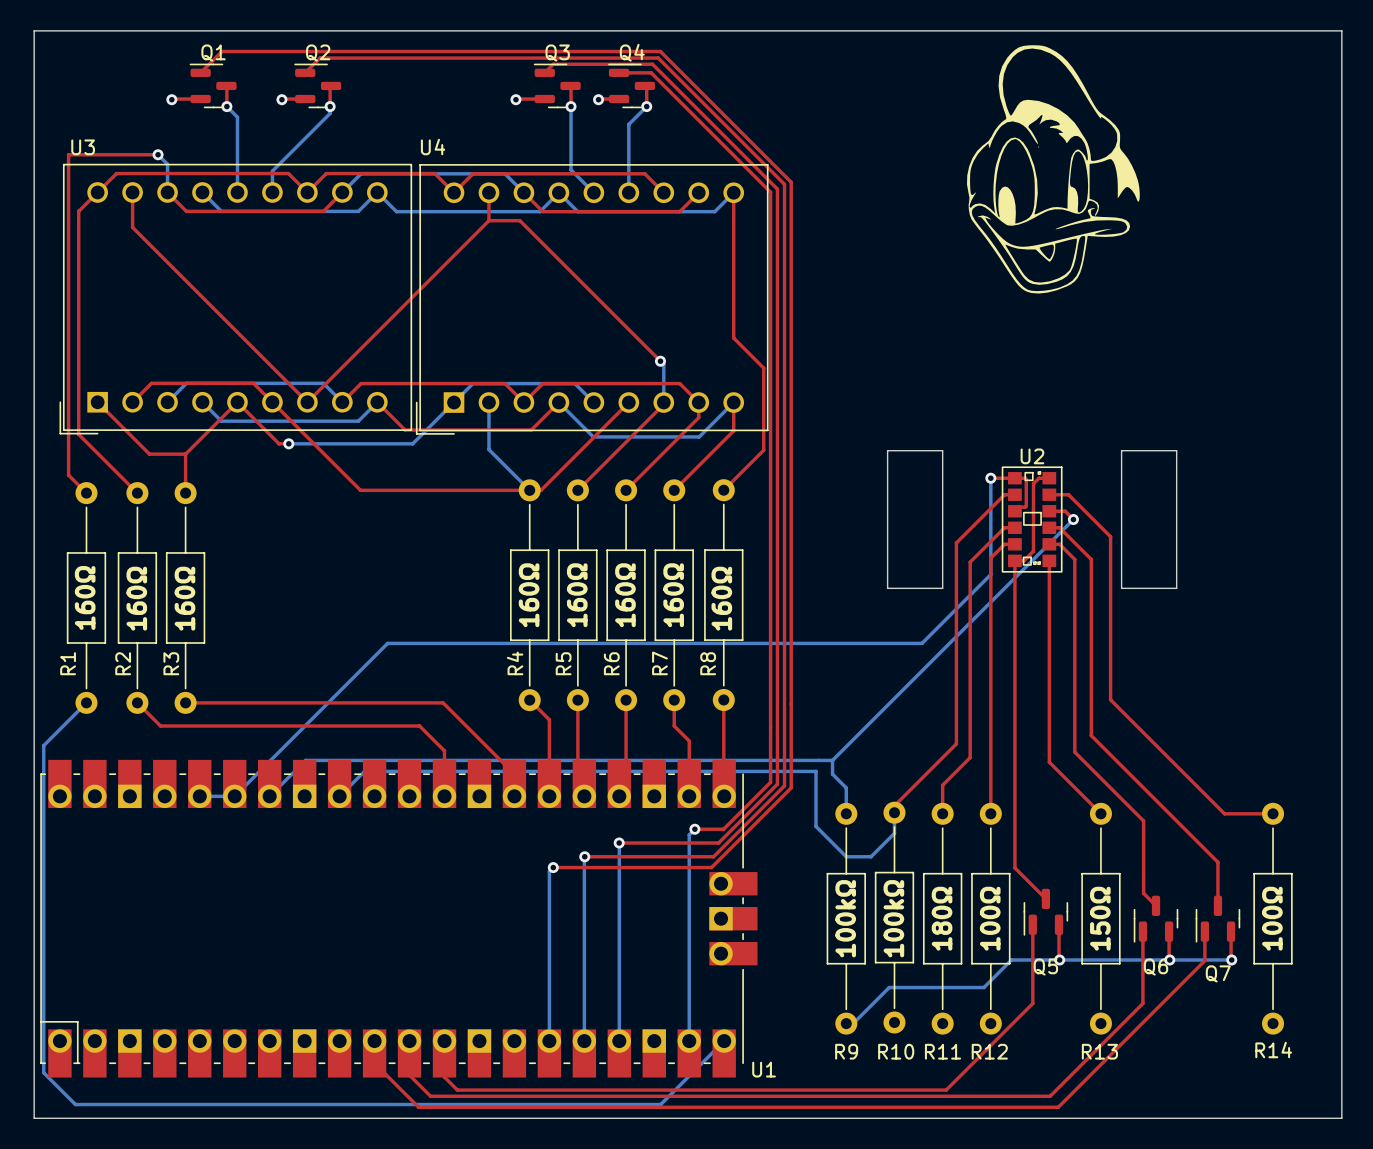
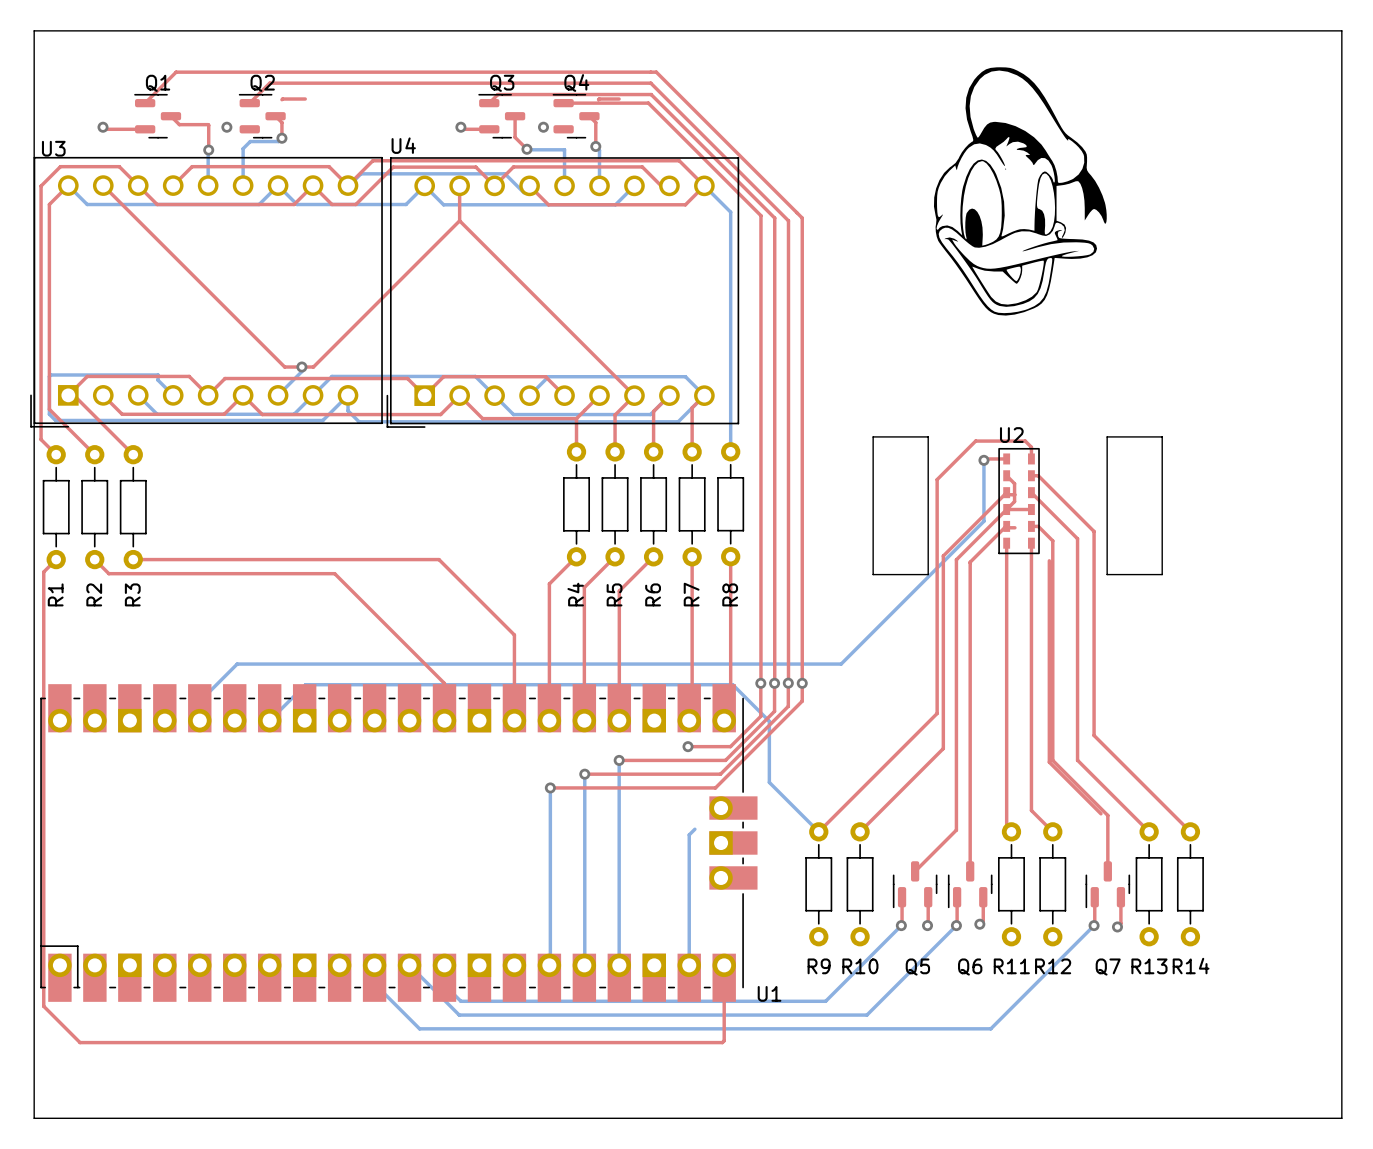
top track: (200, 72) (221, 51) (660, 51) (791, 182) (791, 787) (711, 867) (553, 867) -> none
top track: (305, 72) (320, 58) (658, 58) (784, 184) (784, 785) (713, 856) (584, 856) -> none
top track: (544, 72) (553, 64) (652, 64) (777, 189) (777, 784) (718, 843) (619, 843) -> none
top track: (619, 72) (651, 72) (770, 192) (770, 782) (723, 829) (694, 829) -> none
Q1 position: (213, 85) -> (157, 116)
top track: (226, 85) (226, 106) -> none
Q2 position: (317, 85) -> (262, 116)
top track: (331, 85) (330, 106) -> none
Q3 position: (557, 85) -> (501, 116)
top track: (570, 85) (571, 106) -> none
Q4 position: (631, 85) -> (576, 116)
top track: (644, 85) (646, 87) (646, 106) -> none
via: (171, 99) -> none
top track: (200, 99) (171, 99) -> none
via: (281, 99) -> none
via: (515, 99) -> none
top track: (544, 99) (515, 99) -> none
via: (598, 99) -> none
top track: none -> (145, 103) (176, 72) (656, 72) (802, 218) (802, 701) (715, 787) (550, 787)
top track: none -> (249, 103) (269, 83) (650, 83) (788, 220) (788, 682)
top track: none -> (489, 103) (497, 94) (651, 94) (774, 218) (774, 683)
top track: none -> (563, 103) (648, 103) (760, 215) (760, 683)
bottom track: (226, 106) (237, 117) (237, 192) -> none
via position: (226, 106) -> (226, 127)
bottom track: (330, 106) (330, 113) (272, 171) (272, 192) -> none
via: (330, 106) -> none
bottom track: (571, 106) (571, 169) (593, 192) -> none
via: (571, 106) -> none
bottom track: (646, 106) (628, 124) (628, 192) -> none
via: (646, 106) -> none
top track: none -> (170, 116) (179, 124) (208, 124) (208, 150)
top track: none -> (275, 116) (281, 122) (281, 138)
top track: none -> (515, 116) (515, 137) (526, 149)
top track: none -> (589, 116) (595, 122) (595, 146)
top track: none -> (103, 127) (105, 129) (145, 129)
via: none -> (103, 127)
top track: none -> (460, 127) (462, 129) (489, 129)
via: none -> (460, 127)
via: none -> (543, 127)
bottom track: none -> (281, 138) (278, 141) (250, 141) (243, 148) (243, 185)
via: none -> (281, 138)
via: none -> (595, 146)
U3 name position: U3 (83, 147) -> U3 (53, 148)
U4 name position: U4 (433, 147) -> U4 (403, 145)
bottom track: none -> (598, 148) (599, 185)
bottom track: none -> (526, 149) (564, 149) (564, 185)
via: none -> (526, 149)
bottom track: none -> (208, 150) (208, 185)
via: none -> (208, 150)
top track: (158, 154) (68, 154) (68, 475) (86, 493) -> none
bottom track: (158, 154) (167, 164) (167, 192) -> none
via: (158, 154) -> none
drawing position: (1053, 169) -> (1020, 191)
top track: none -> (68, 185) (49, 204) (49, 409) (94, 454)
bottom track: none -> (68, 185) (87, 204) (259, 204) (278, 185) (297, 204) (406, 204) (424, 185) (443, 204) (615, 204) (634, 185)
top track: none -> (103, 185) (284, 367) (313, 367) (459, 220)
top track: none -> (173, 185) (192, 166) (329, 166) (348, 185) (372, 160) (679, 160) (704, 185) (685, 204) (548, 204) (529, 185)
top track: none -> (459, 185) (459, 220)
top track: none -> (669, 185) (661, 185) (642, 166) (513, 166) (494, 185) (475, 167) (393, 167) (355, 204) (331, 204) (313, 185) (294, 204) (157, 204) (119, 166) (60, 166) (41, 186) (41, 439) (56, 454)
bottom track: none -> (704, 185) (730, 212) (730, 451)
top track: (132, 192) (132, 227) (307, 402) (488, 220) -> none
top track: (167, 192) (186, 211) (323, 211) (342, 192) -> none
bottom track: (202, 192) (221, 211) (358, 211) (377, 192) (396, 211) (539, 211) (558, 192) (577, 211) (714, 211) (733, 192) -> none
top track: (488, 192) (488, 220) -> none
top track: (523, 192) (542, 211) (679, 211) (698, 192) -> none
top track: (663, 192) (644, 173) (472, 173) (454, 192) (434, 173) (326, 173) (307, 192) (288, 173) (116, 173) (78, 211) (78, 434) (137, 493) -> none
top track: (733, 192) (733, 338) (763, 368) (763, 450) (723, 490) -> none
top track: none -> (459, 220) (634, 395) (615, 415) (615, 451)
top track: (488, 220) (519, 220) (660, 361) -> none
U3 position: (235, 299) -> (206, 292)
U4 position: (592, 299) -> (562, 292)
bottom track: (660, 361) (663, 364) (663, 402) -> none
via: (660, 361) -> none
bottom track: none -> (301, 367) (301, 371) (278, 395)
top track: none -> (103, 395) (122, 414) (224, 414) (243, 395) (262, 414) (440, 414) (459, 395) (482, 418) (576, 418)
bottom track: none -> (138, 395) (157, 414) (294, 414) (331, 376) (475, 376) (513, 414) (650, 414) (669, 395)
bottom track: none -> (173, 395) (158, 380) (158, 374) (49, 376) (49, 414) (55, 420) (322, 420) (348, 395) (348, 410) (359, 421) (678, 421) (704, 395) (685, 376) (548, 376) (529, 395)
top track: none -> (564, 395) (545, 376) (443, 376) (424, 395) (407, 378) (225, 378) (208, 395) (189, 376) (87, 376) (68, 395) (73, 395) (133, 454)
top track: none -> (599, 395) (576, 418)
top track: none -> (669, 395) (653, 411) (653, 451)
top track: none -> (704, 395) (692, 407) (692, 451)
top track: (97, 402) (149, 454) (185, 454) -> none
top track: (132, 402) (151, 383) (253, 383) (360, 490) (541, 490) (628, 402) -> none
bottom track: (167, 402) (186, 383) (323, 383) (342, 402) -> none
bottom track: (202, 402) (221, 421) (358, 421) (377, 402) -> none
top track: (342, 402) (361, 383) (505, 383) (523, 402) (542, 383) (679, 383) (698, 402) (698, 417) (626, 490) -> none
top track: (377, 402) (405, 430) (531, 430) (558, 402) -> none
bottom track: (488, 402) (488, 449) (529, 490) -> none
bottom track: (558, 402) (593, 436) (699, 436) (733, 402) -> none
bottom track: (593, 402) (574, 383) (472, 383) (412, 443) (288, 443) -> none
top track: (663, 402) (577, 490) -> none
top track: (733, 402) (733, 430) (674, 490) -> none
top track: none -> (576, 418) (576, 451)
top track: (288, 443) (279, 443) (237, 402) (185, 454) -> none
via position: (288, 443) -> (301, 367)
board edge: (887, 450) (942, 450) (942, 588) (887, 588) (887, 450) -> (873, 436) (928, 436) (928, 574) (873, 574) (873, 436)
board edge: (1121, 450) (1176, 450) (1176, 588) (1121, 588) (1121, 450) -> (1107, 436) (1162, 436) (1162, 574) (1107, 574) (1107, 436)
top track: (185, 454) (185, 493) -> none
top track: none -> (1006, 458) (983, 460)
top track: none -> (1031, 458) (1031, 447) (1025, 441) (975, 441) (937, 479) (937, 713) (818, 831)
bottom track: none -> (983, 460) (983, 521) (841, 664) (237, 664) (199, 701) (199, 720)
U2 footprint: [1001, 466, 1063, 573] -> [998, 447, 1040, 555]
top track: none -> (1031, 475) (1038, 475) (1094, 531) (1094, 735) (1190, 831)
top track: (990, 478) (1026, 479) (1026, 506) (1019, 507) (1014, 511) -> none
bottom track: (990, 478) (990, 574) (922, 643) (387, 643) (234, 796) (199, 796) -> none
via position: (990, 478) -> (983, 460)
top track: (1049, 478) (1039, 478) (1033, 483) (1033, 551) (1023, 560) (1014, 560) (1014, 867) (1045, 898) -> none
R4 footprint: [510, 479, 550, 712] -> [563, 442, 591, 567]
R5 footprint: [558, 479, 598, 712] -> [601, 442, 629, 567]
R6 footprint: [606, 479, 646, 712] -> [640, 442, 668, 567]
R7 footprint: [654, 479, 694, 712] -> [678, 442, 706, 567]
R8 footprint: [704, 479, 744, 711] -> [717, 442, 745, 567]
R1 footprint: [66, 482, 107, 714] -> [42, 445, 70, 570]
R2 footprint: [117, 482, 158, 714] -> [81, 445, 109, 570]
R3 footprint: [165, 482, 206, 714] -> [119, 445, 147, 570]
top track: none -> (1031, 492) (1077, 538) (1077, 760) (1149, 831)
top track: (1049, 494) (1068, 494) (1110, 536) (1110, 699) (1224, 813) (1273, 813) -> none
top track: none -> (1006, 509) (1031, 509)
top track: (1049, 511) (1065, 511) (1073, 519) -> none
bottom track: (1073, 519) (832, 760) -> none
via: (1073, 519) -> none
top track: none -> (1031, 526) (1038, 526) (1052, 540) (1052, 760) (1107, 815) (1107, 871)
top track: (1049, 527) (1059, 527) (1091, 559) (1091, 735) (1217, 862) (1217, 905) -> none
top track: (956, 542) (956, 559) -> (1006, 475) (1014, 483) (1014, 501) (956, 559)
top track: none -> (956, 542) (943, 555) (943, 748) (860, 831)
top track: none -> (1006, 543) (1006, 827) (1011, 831)
top track: none -> (1031, 543) (1031, 810) (1052, 831)
top track: (1014, 544) (1004, 544) (990, 558) (990, 813) -> none
top track: (1049, 544) (1059, 544) (1074, 559) (1074, 752) (1143, 820) (1143, 893) (1156, 905) -> none
top track: none -> (615, 556) (584, 587) (584, 720)
top track: none -> (653, 556) (619, 591) (619, 720)
top track: none -> (692, 556) (692, 717) (689, 720)
top track: none -> (730, 556) (730, 714) (724, 720)
top track: none -> (56, 559) (43, 572) (43, 1006) (80, 1042) (722, 1042) (724, 1040) (724, 965)
top track: none -> (94, 559) (108, 573) (334, 573) (444, 683) (444, 720)
top track: none -> (133, 559) (439, 559) (514, 635) (514, 720)
text: 160Ω (529, 595) -> none
text: 160Ω (577, 595) -> none
text: 160Ω (625, 595) -> none
text: 160Ω (673, 595) -> none
text: 160Ω (85, 597) -> none
text: 160Ω (136, 598) -> none
text: 160Ω (184, 598) -> none
text: 160Ω (721, 598) -> none
R1 name position: R1 (68, 663) -> R1 (55, 594)
top track: none -> (760, 683) (760, 716) (730, 746) (688, 746)
via: none -> (760, 683)
top track: none -> (774, 683) (774, 711) (725, 760) (619, 760)
via: none -> (774, 683)
top track: none -> (788, 683) (788, 706) (720, 774) (584, 774)
via: none -> (788, 683)
via: none -> (802, 683)
top track: (723, 699) (724, 796) -> none
top track: (529, 700) (549, 719) -> (576, 556) (549, 583) (549, 719)
top track: (577, 700) (577, 789) (584, 796) -> none
top track: (626, 700) (626, 789) (619, 796) -> none
top track: (674, 700) (674, 726) (689, 741) (689, 796) -> none
bottom track: (86, 702) (43, 745) (43, 1072) (75, 1104) (660, 1104) (724, 1041) -> none
top track: (137, 702) (160, 726) (419, 726) (444, 750) (444, 796) -> none
top track: (185, 702) (443, 702) (514, 774) (514, 796) -> none
bottom track: none -> (269, 720) (305, 684) (732, 684) (769, 721) (769, 782) (818, 831)
top track: (549, 720) (549, 796) -> none
top track: (956, 743) (894, 805) (894, 812) -> (956, 743) (956, 830) (915, 871)
via: none -> (688, 746)
top track: (970, 757) (942, 785) (942, 813) -> (970, 757) (970, 871)
bottom track: none -> (619, 760) (619, 965)
via: none -> (619, 760)
bottom track: (832, 760) (305, 760) (269, 796) -> none
bottom track: (832, 760) (832, 774) (846, 787) (846, 813) -> none
bottom track: none -> (584, 774) (584, 965)
via: none -> (584, 774)
bottom track: none -> (550, 787) (549, 965)
via: none -> (550, 787)
bottom track: (339, 796) (364, 771) (816, 771) (816, 826) (846, 856) (871, 856) (894, 833) (894, 812) -> none
R10 footprint: [874, 801, 915, 1034] -> [846, 822, 874, 947]
R9 footprint: [826, 802, 866, 1035] -> [805, 822, 833, 947]
R11 footprint: [922, 802, 963, 1035] -> [997, 822, 1025, 947]
R12 footprint: [971, 802, 1011, 1035] -> [1039, 822, 1067, 947]
R13 footprint: [1081, 802, 1121, 1035] -> [1135, 822, 1163, 947]
R14 footprint: [1253, 802, 1293, 1035] -> [1176, 822, 1204, 947]
via: (694, 829) -> none
bottom track: (619, 843) (619, 1041) -> none
via: (619, 843) -> none
bottom track: (584, 856) (584, 1041) -> none
via: (584, 856) -> none
bottom track: (553, 867) (549, 871) (549, 1041) -> none
via: (553, 867) -> none
top track: none -> (902, 897) (901, 925)
top track: none -> (928, 897) (927, 925)
top track: none -> (957, 897) (956, 925)
top track: none -> (983, 897) (983, 920) (979, 924)
top track: none -> (1094, 897) (1094, 925)
top track: none -> (1120, 897) (1120, 923) (1117, 926)
Q5 position: (1045, 912) -> (915, 884)
U1 position: (398, 918) -> (398, 843)
text: 100kΩ (845, 918) -> none
text: 100kΩ (893, 918) -> none
text: 180Ω (942, 918) -> none
text: 100Ω (990, 918) -> none
text: 150Ω (1100, 918) -> none
text: 100Ω (1272, 918) -> none
Q6 position: (1156, 919) -> (970, 884)
Q7 position: (1217, 919) -> (1107, 884)
via: none -> (979, 924)
top track: (1032, 924) (1032, 1003) (946, 1090) (457, 1090) (444, 1077) (444, 1041) -> none
top track: (1058, 924) (1059, 960) -> none
bottom track: none -> (901, 925) (825, 1001) (460, 1001) (444, 984) (444, 958)
via: none -> (901, 925)
via: none -> (927, 925)
bottom track: none -> (956, 925) (866, 1015) (459, 1015) (409, 965)
via: none -> (956, 925)
bottom track: none -> (1094, 925) (990, 1028) (419, 1028) (374, 983) (374, 965)
via: none -> (1094, 925)
via: none -> (1117, 926)
top track: (1142, 931) (1142, 1003) (1050, 1096) (430, 1096) (409, 1075) (409, 1041) -> none
top track: (1169, 931) (1169, 960) -> none
top track: (1204, 931) (1204, 960) (1058, 1107) (418, 1107) (374, 1063) (374, 1041) -> none
top track: (1231, 931) (1231, 960) -> none
via: (1059, 960) -> none
via: (1169, 960) -> none
bottom track: (1231, 960) (1011, 960) (983, 987) (889, 987) (846, 1030) -> none
via: (1231, 960) -> none
bottom track: (689, 965) (689, 1041) -> none
Q5 name position: Q5 (1045, 967) -> Q5 (917, 967)
Q6 name position: Q6 (1156, 967) -> Q6 (970, 967)
Q7 name position: Q7 (1218, 973) -> Q7 (1108, 967)
R14 name position: R14 (1273, 1050) -> R14 (1191, 966)
R9 name position: R9 (846, 1051) -> R9 (819, 966)
R10 name position: R10 (896, 1051) -> R10 (860, 966)
R11 name position: R11 (942, 1051) -> R11 (1011, 966)
R12 name position: R12 (989, 1051) -> R12 (1053, 966)
R13 name position: R13 (1099, 1051) -> R13 (1149, 966)
U1 name position: U1 (764, 1069) -> U1 (769, 993)

